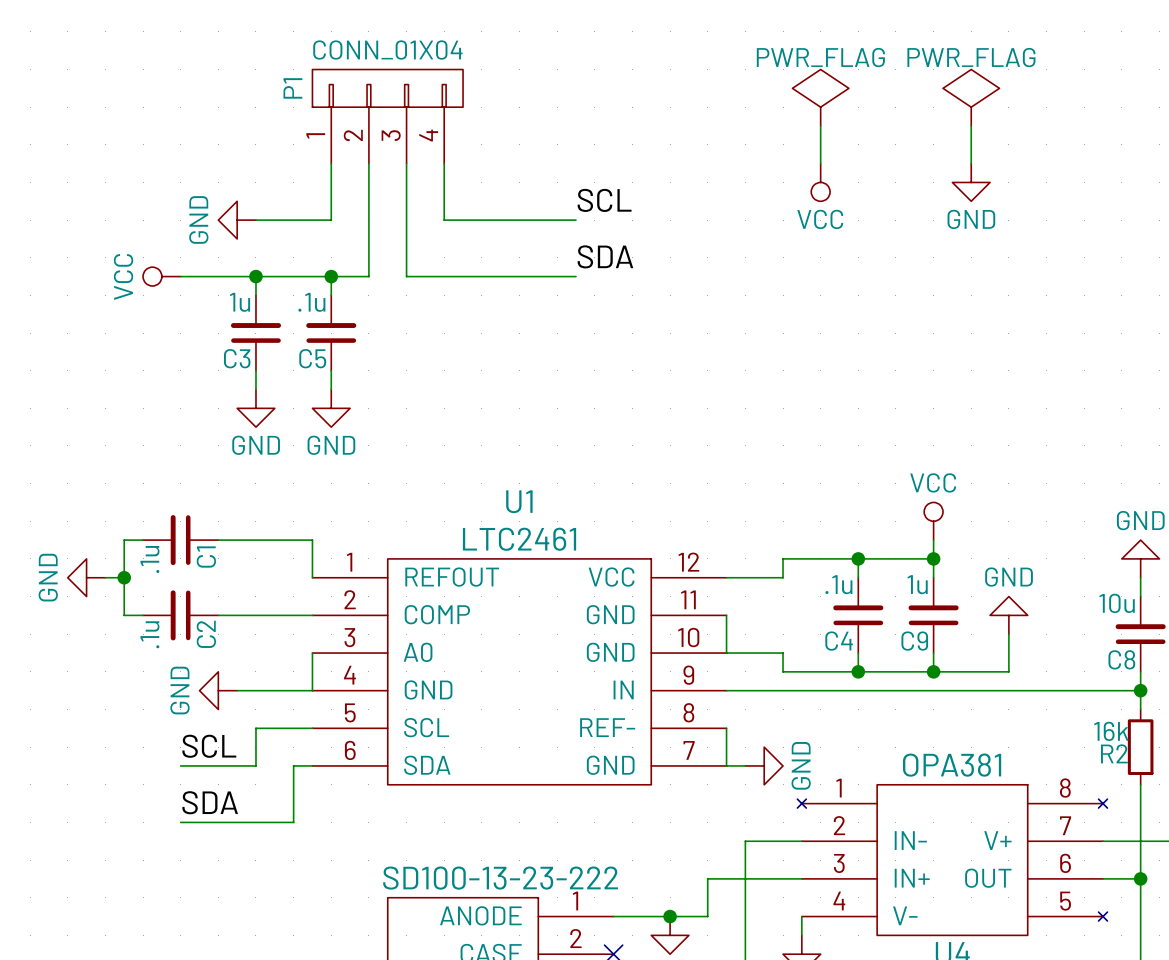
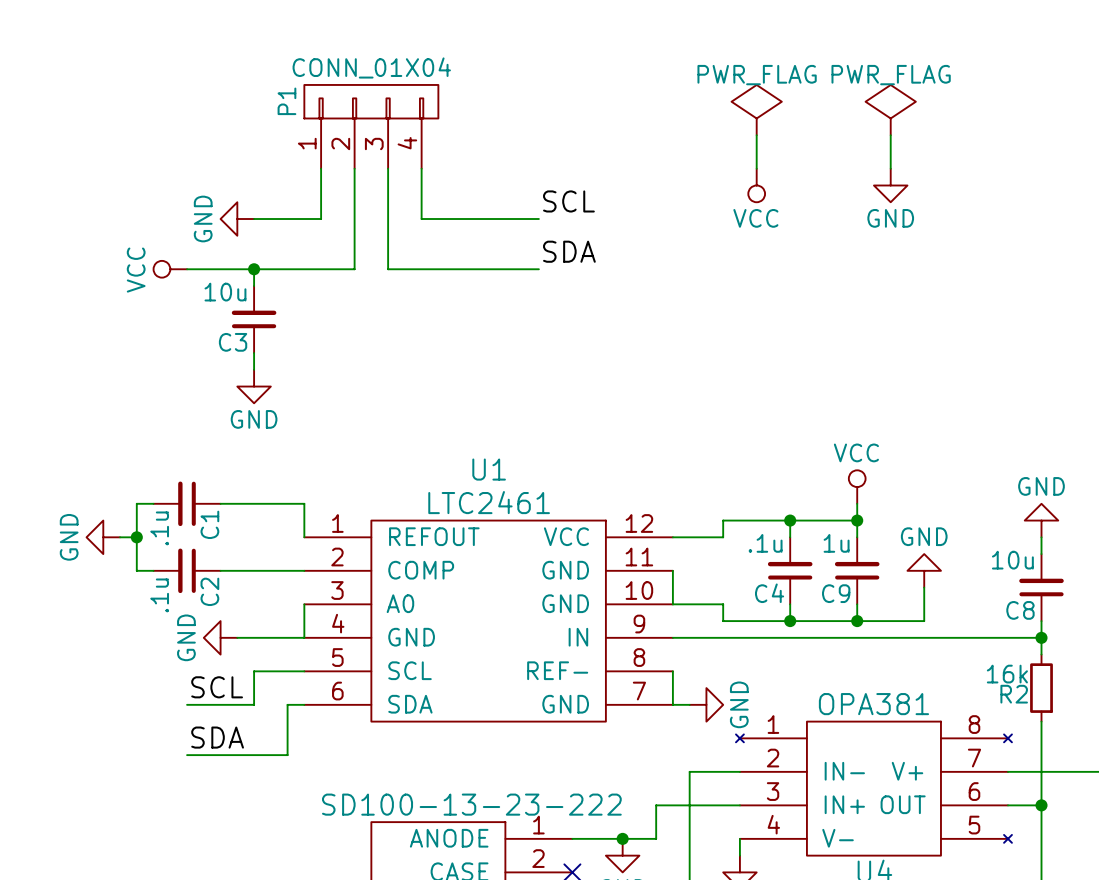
wire: (331, 276) (331, 295) -> none
junction: (331, 276) -> none
C3 value: 1u (240, 302) -> 10u (225, 292)
C5: .1u (331, 333) -> none
wire: (331, 370) (331, 389) -> none
power symbol: GND (331, 408) -> none

